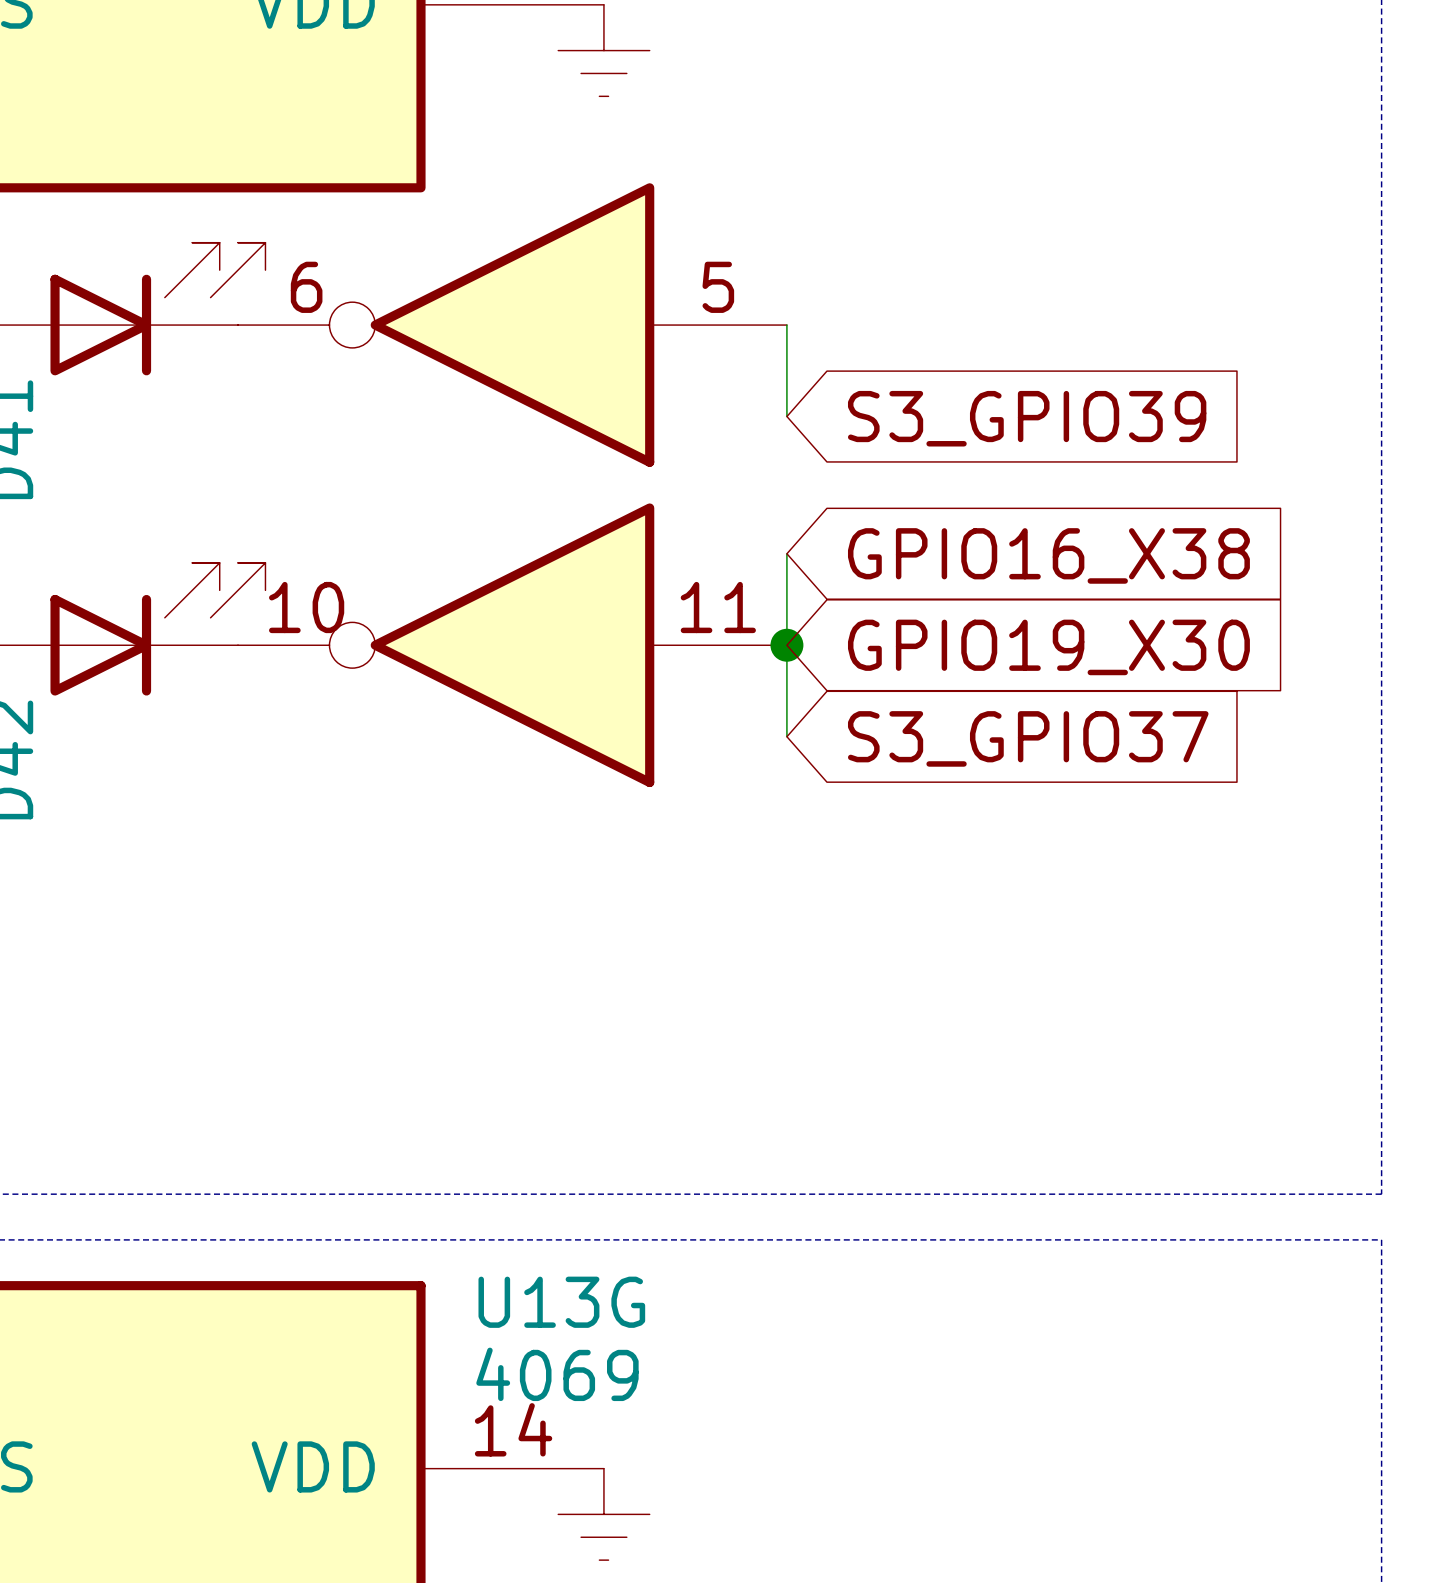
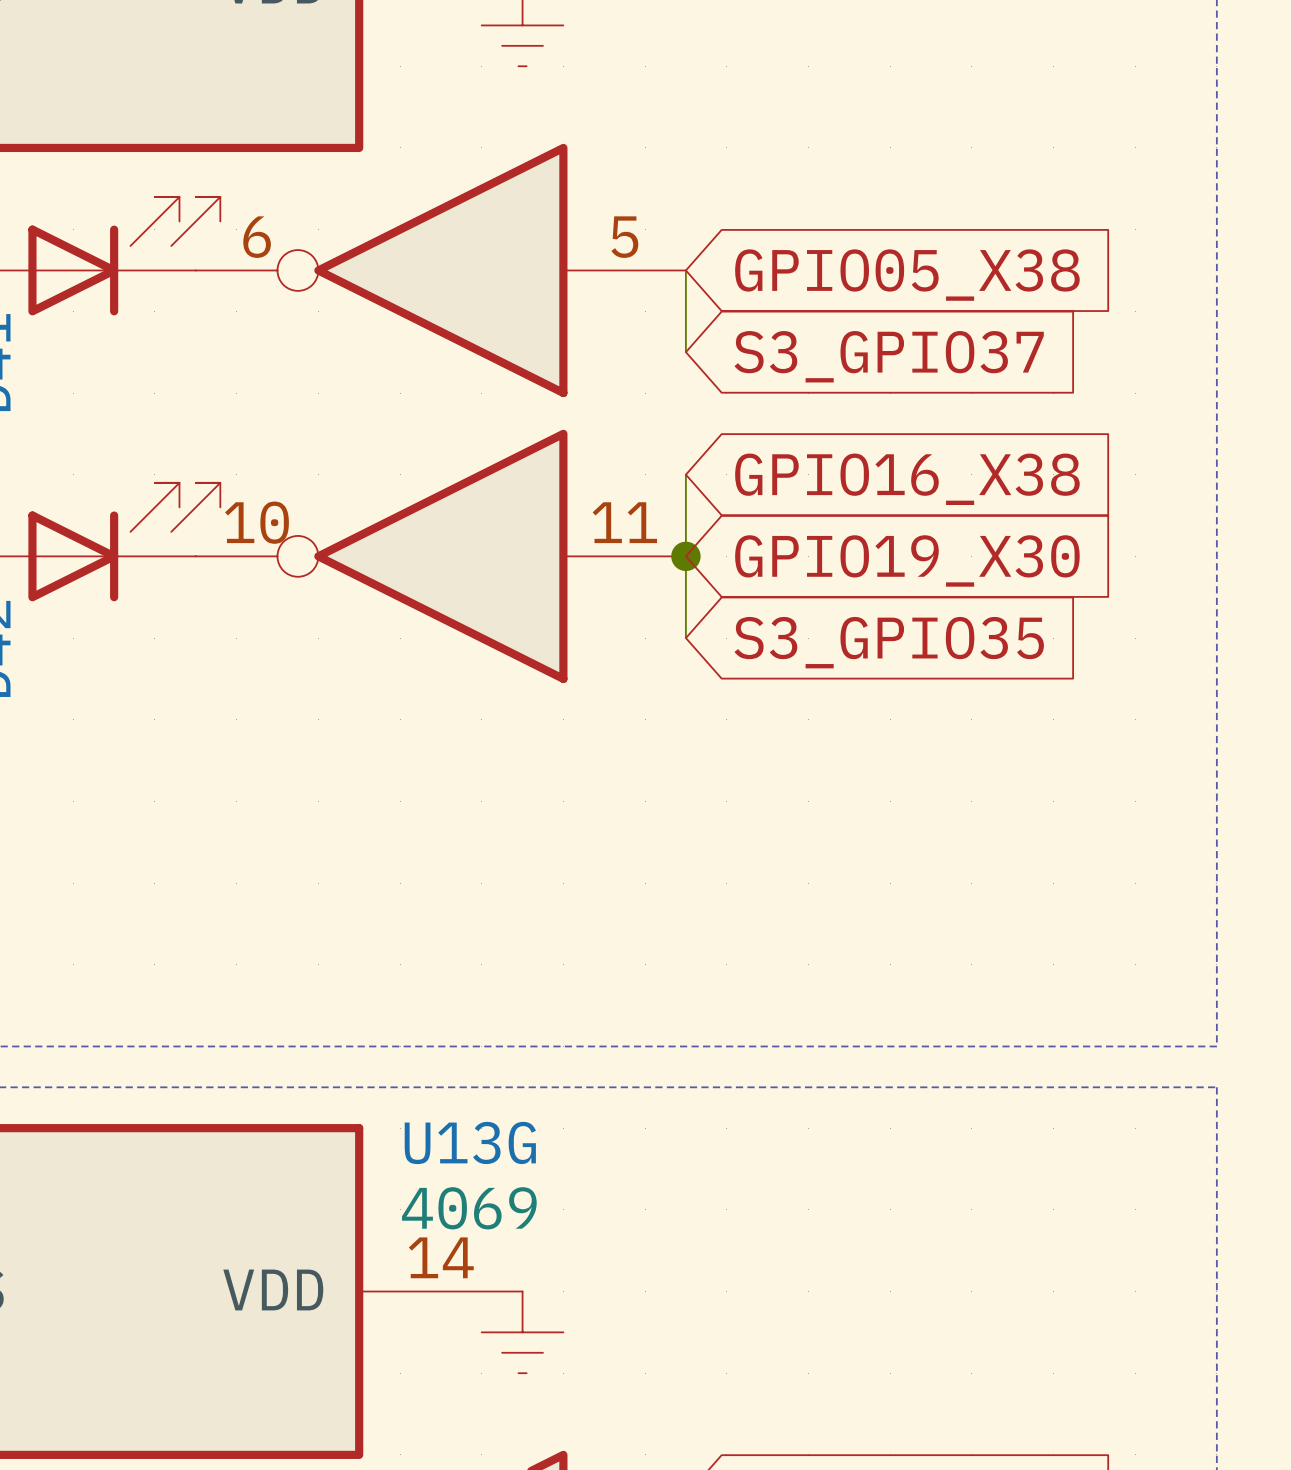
global label: none -> GPIO05_X38 (907, 275)
global label: S3_GPIO39 (1027, 418) -> S3_GPIO37 (889, 356)
global label: S3_GPIO37 (1028, 738) -> S3_GPIO35 (889, 642)

